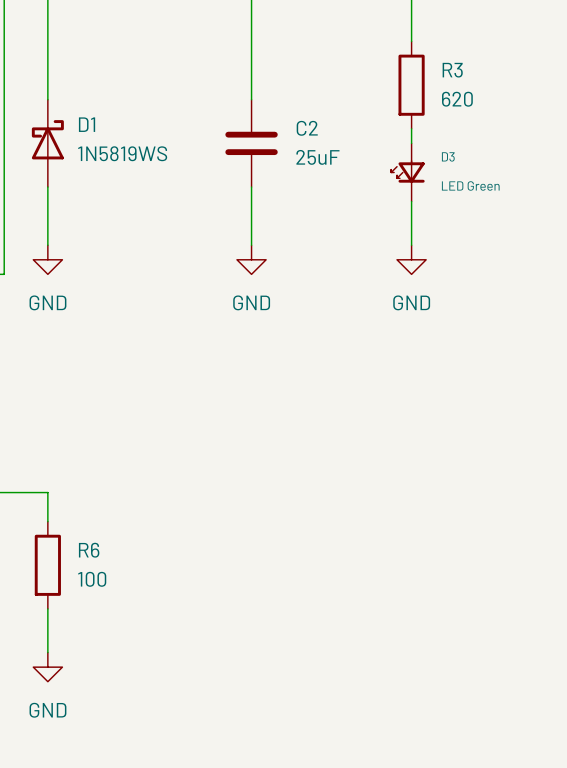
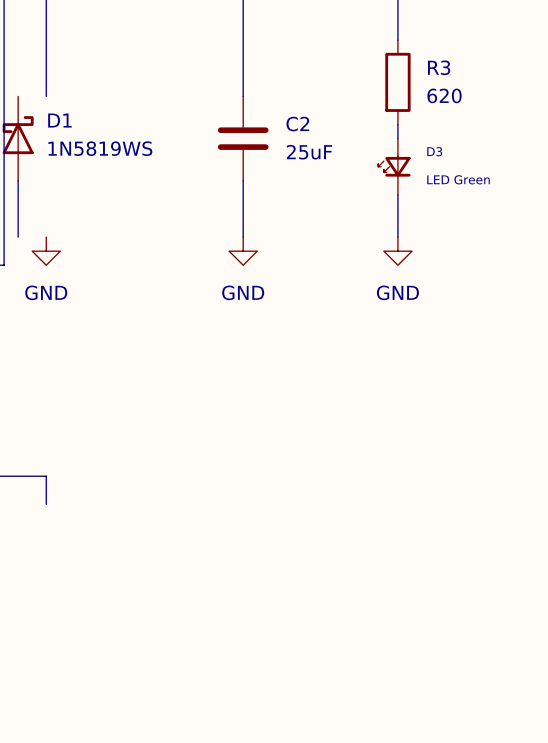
D1 position: (47, 143) -> (18, 138)
wire: (47, 187) (47, 245) -> (18, 180) (18, 237)
R6: 100 (47, 565) -> none
wire: (47, 608) (47, 652) -> none
power symbol: GND (47, 667) -> none

